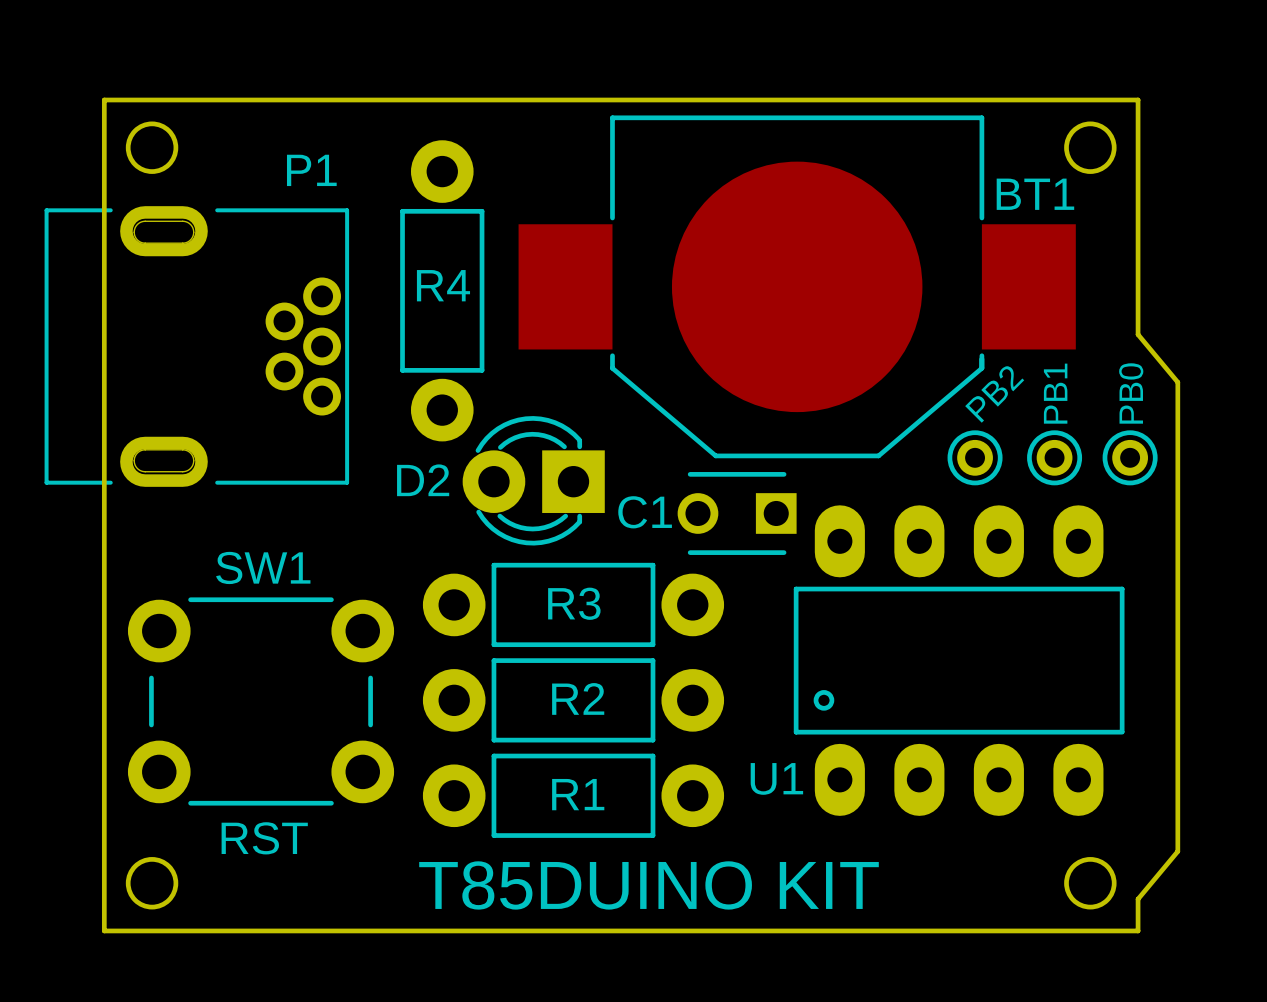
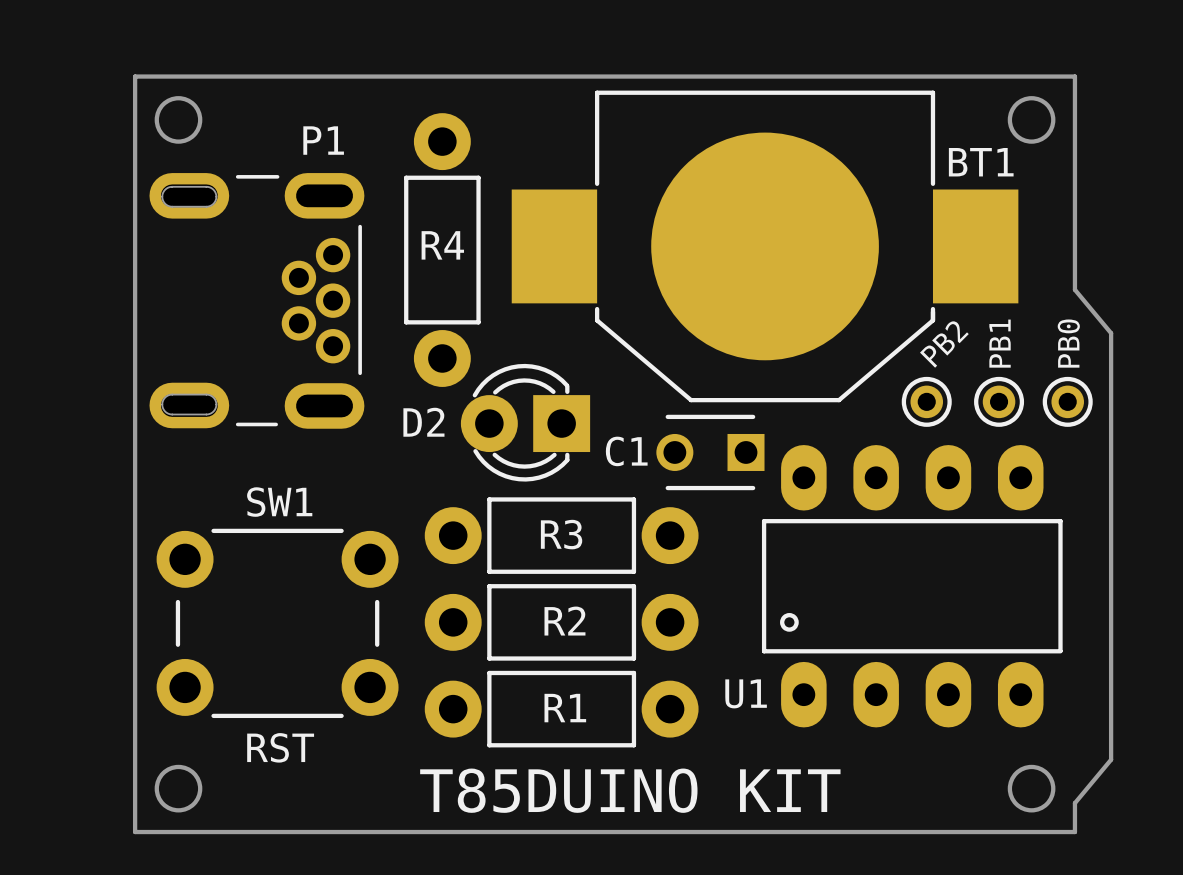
P1 footprint: [44, 206, 350, 487] -> [149, 173, 365, 429]

